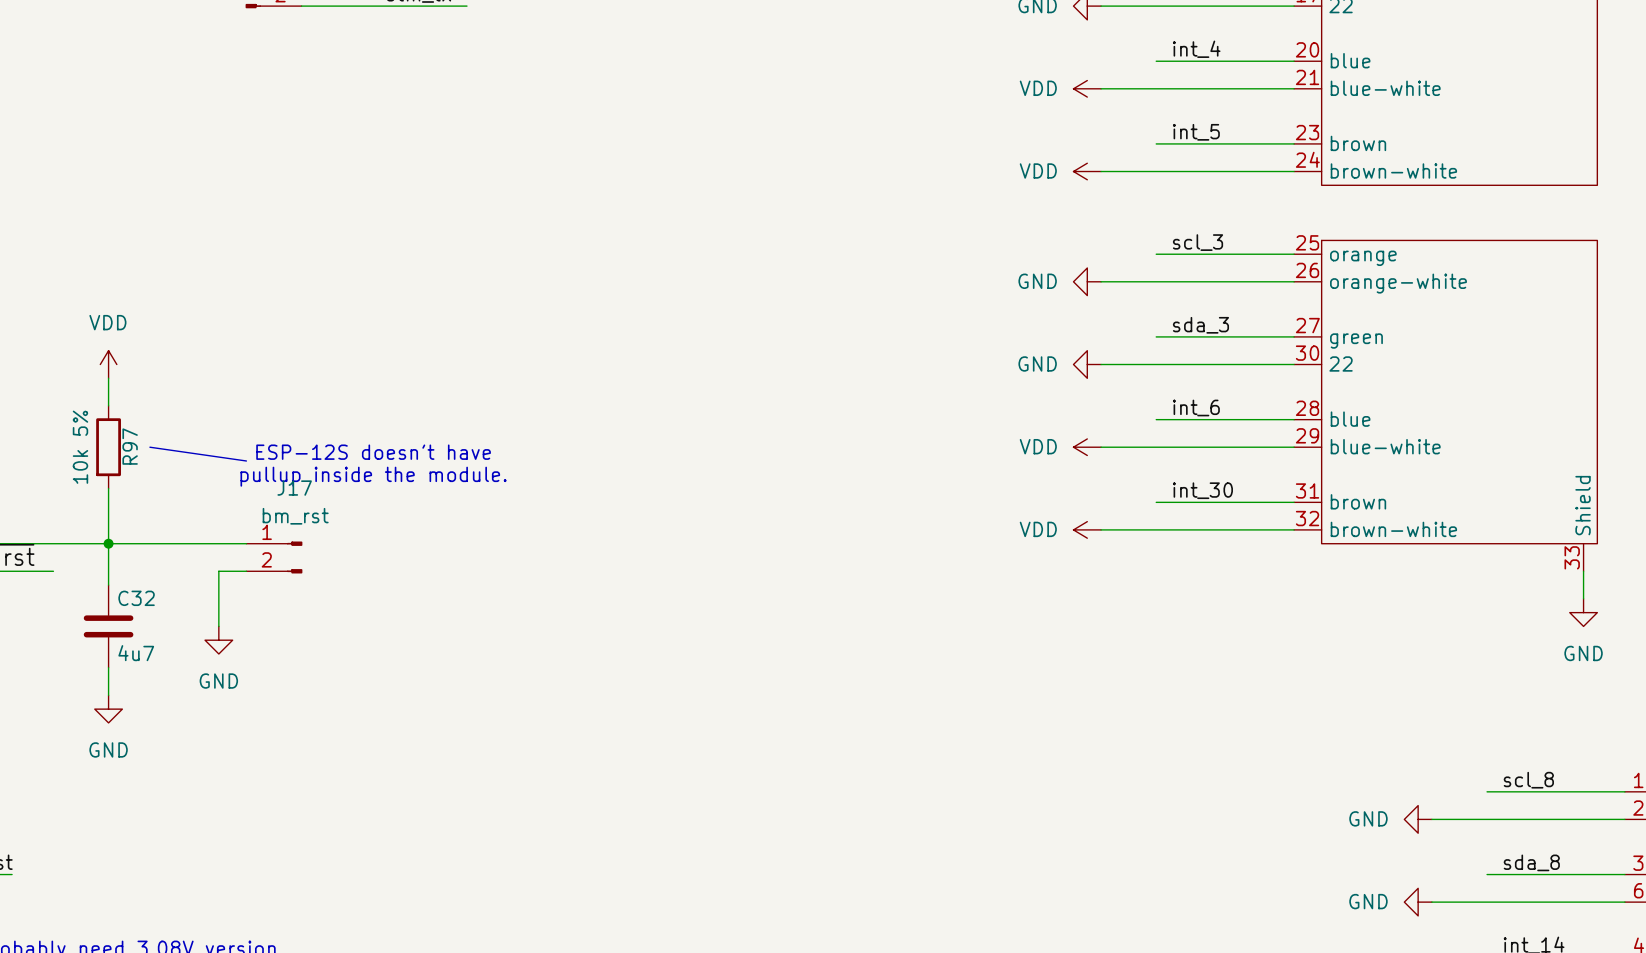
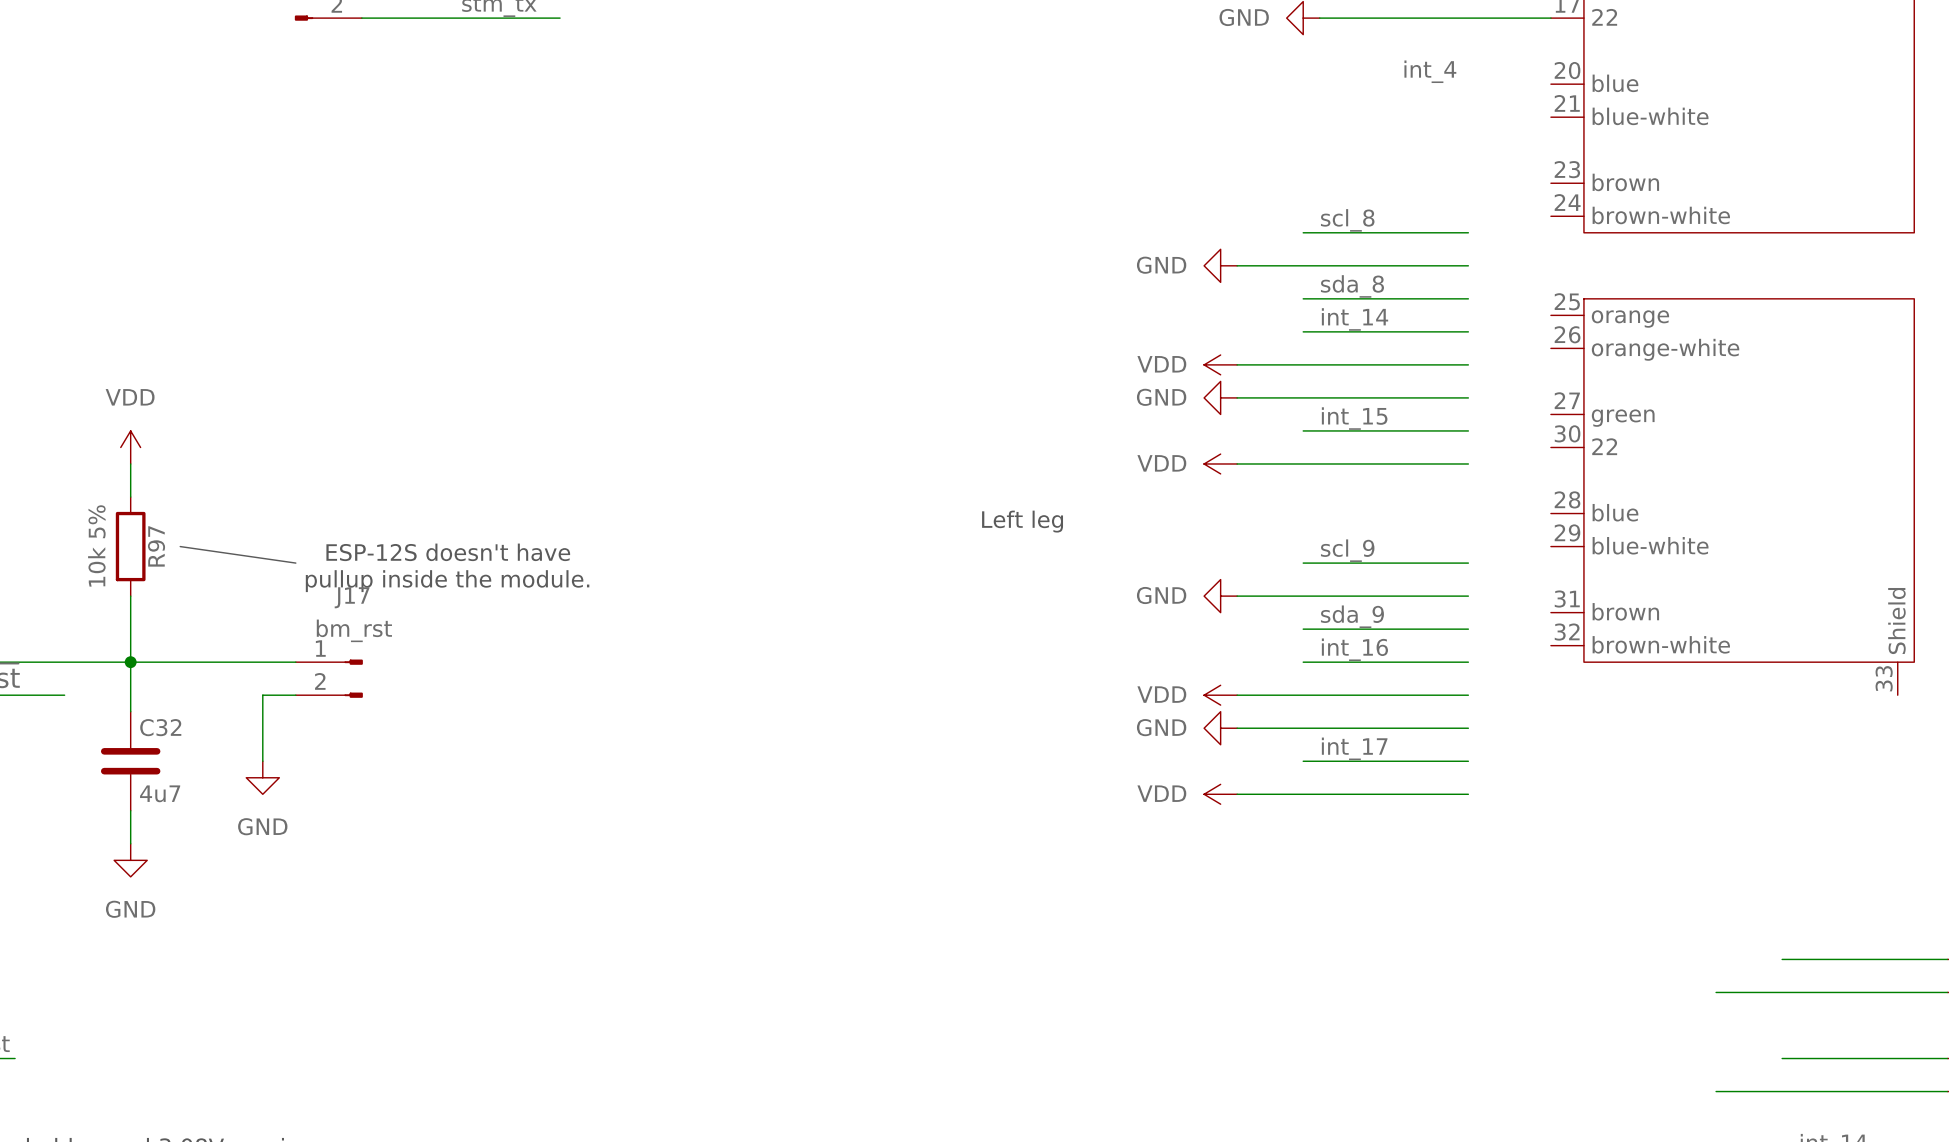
wire: (1156, 61) (1294, 61) -> (1303, 331) (1468, 331)
power symbol: VDD (1087, 88) -> none
wire: (1101, 88) (1294, 88) -> (1237, 364) (1468, 364)
label: int_5 (1196, 132) -> none
wire: (1156, 143) (1294, 143) -> (1303, 232) (1468, 232)
power symbol: VDD (1087, 171) -> none
wire: (1101, 171) (1294, 171) -> (1237, 265) (1468, 265)
label: none -> scl_8 (1347, 220)
power symbol: none -> GND (1220, 265)
label: none -> sda_8 (1352, 286)
label: scl_3 (1198, 242) -> none
wire: (1156, 254) (1294, 254) -> (1303, 298) (1468, 298)
label: none -> int_14 (1355, 319)
power symbol: GND (1087, 281) -> none
wire: (1101, 281) (1294, 281) -> (1237, 397) (1468, 397)
power symbol: none -> VDD (1220, 364)
power symbol: none -> GND (1220, 397)
label: sda_3 (1200, 325) -> none
wire: (1156, 336) (1294, 336) -> (1303, 430) (1468, 430)
label: none -> int_15 (1354, 418)
power symbol: GND (1087, 364) -> none
wire: (1101, 364) (1294, 364) -> (1237, 728) (1468, 728)
power symbol: none -> VDD (1220, 463)
wire: none -> (1237, 463) (1468, 463)
label: int_6 (1196, 408) -> none
wire: (1156, 419) (1294, 419) -> (1303, 563) (1468, 563)
text: none -> Left leg (1022, 521)
power symbol: VDD (1087, 447) -> none
wire: (1101, 447) (1294, 447) -> (1237, 596) (1468, 596)
label: none -> scl_9 (1347, 550)
power symbol: none -> GND (1220, 596)
label: int_30 (1202, 490) -> none
wire: (1156, 502) (1294, 502) -> (1303, 662) (1468, 662)
label: none -> sda_9 (1352, 616)
wire: none -> (1303, 629) (1468, 629)
power symbol: VDD (1087, 529) -> none
wire: (1101, 529) (1294, 529) -> (1237, 695) (1468, 695)
label: none -> int_16 (1354, 649)
power symbol: none -> VDD (1220, 695)
wire: (1583, 571) (1583, 598) -> none
power symbol: none -> GND (1220, 728)
power symbol: GND (1583, 612) -> none
label: none -> int_17 (1354, 748)
wire: none -> (1303, 761) (1468, 761)
power symbol: none -> VDD (1220, 794)
wire: none -> (1237, 794) (1468, 794)
label: scl_8 (1528, 780) -> none
power symbol: GND (1418, 819) -> none
label: sda_8 (1531, 862) -> none
power symbol: GND (1418, 902) -> none

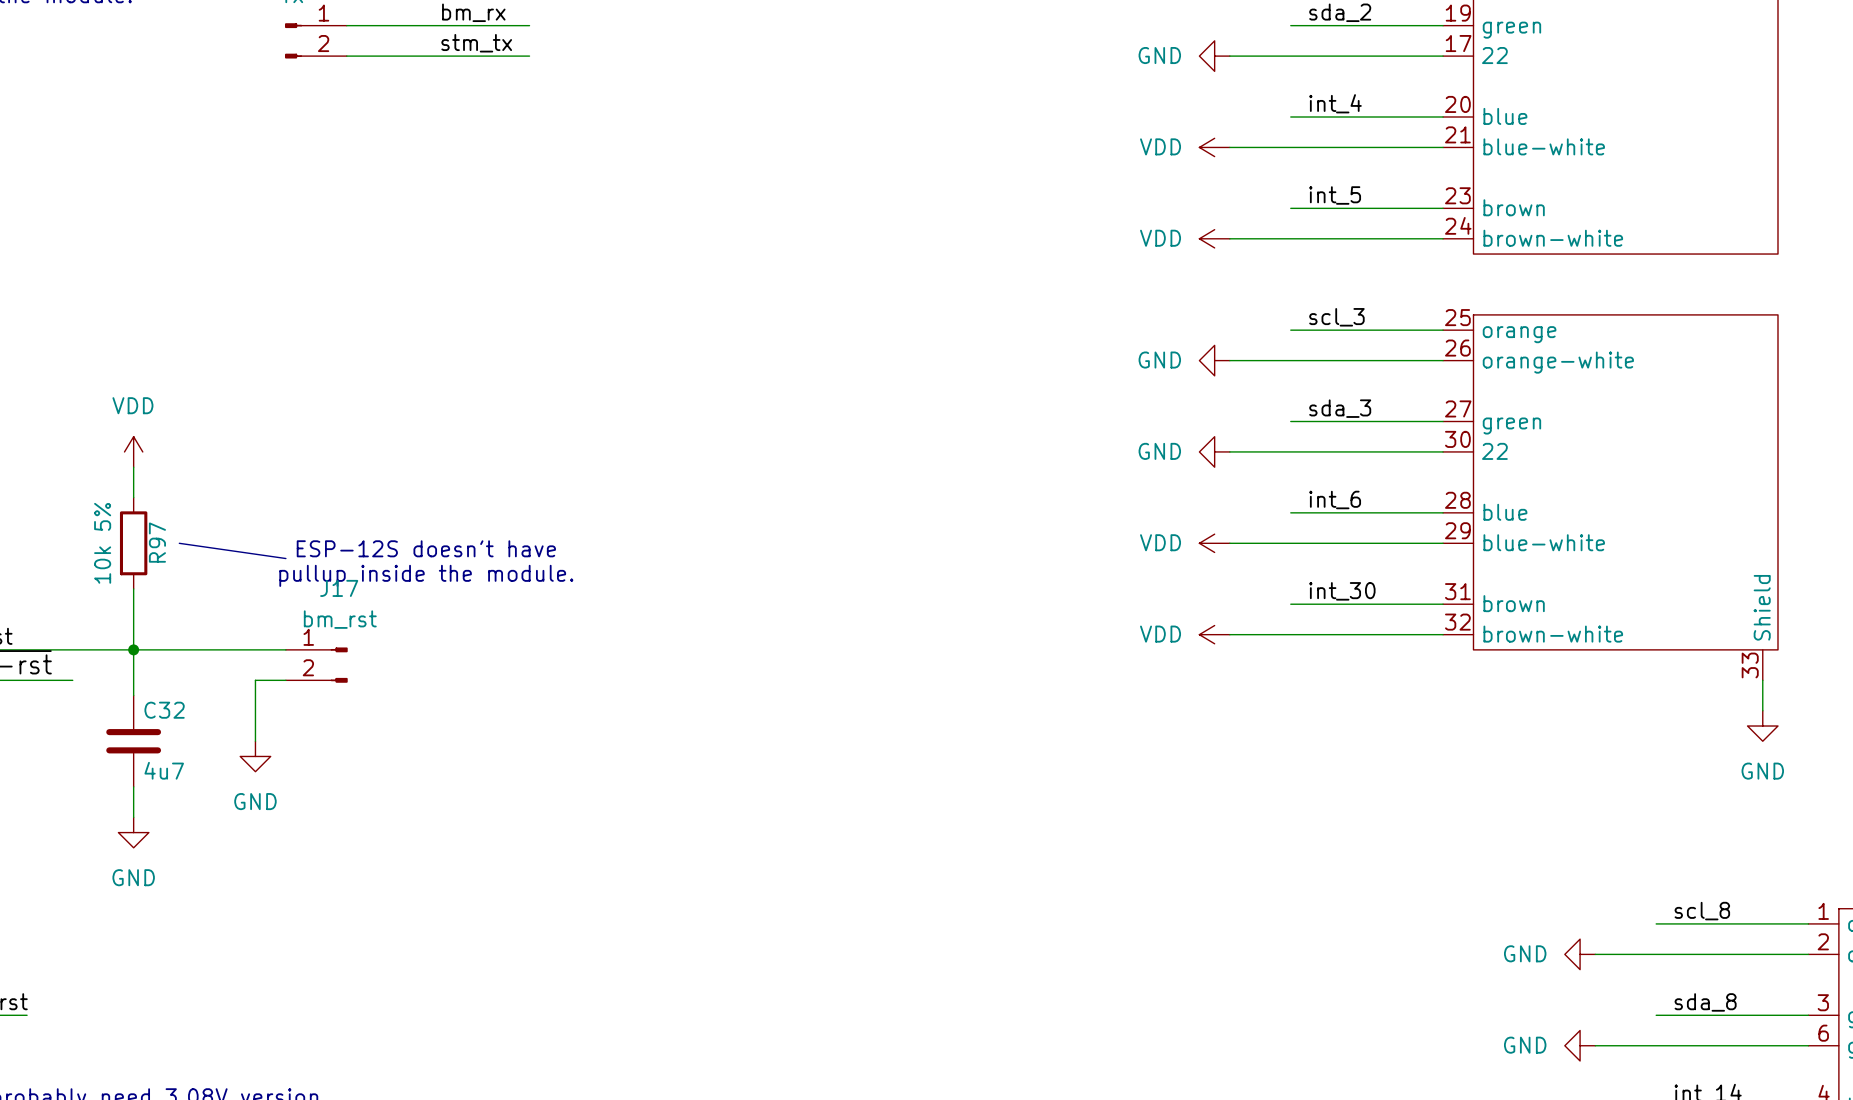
power symbol: none -> VDD (1214, 147)
label: none -> int_5 (1335, 195)
power symbol: none -> VDD (1214, 238)
label: scl_8 (1347, 220) -> none
wire: (1303, 232) (1468, 232) -> (1290, 208) (1443, 208)
power symbol: GND (1220, 265) -> none
wire: (1237, 265) (1468, 265) -> (1229, 238) (1443, 238)
label: sda_8 (1352, 286) -> none
wire: (1303, 298) (1468, 298) -> (1290, 330) (1443, 330)
label: none -> scl_3 (1336, 317)
label: int_14 (1355, 319) -> none
wire: (1303, 331) (1468, 331) -> (1290, 116) (1443, 116)
power symbol: none -> GND (1214, 360)
power symbol: VDD (1220, 364) -> none
wire: (1237, 364) (1468, 364) -> (1229, 147) (1443, 147)
power symbol: GND (1220, 397) -> none
wire: (1237, 397) (1468, 397) -> (1229, 360) (1443, 360)
label: none -> sda_3 (1340, 408)
label: int_15 (1354, 418) -> none
wire: (1303, 430) (1468, 430) -> (1290, 421) (1443, 421)
power symbol: none -> GND (1214, 451)
power symbol: VDD (1220, 463) -> none
wire: (1237, 463) (1468, 463) -> none
label: none -> int_6 (1335, 499)
text: Left leg (1022, 521) -> none
power symbol: none -> VDD (1214, 543)
label: scl_9 (1347, 550) -> none
wire: (1303, 563) (1468, 563) -> (1290, 512) (1443, 512)
power symbol: GND (1220, 596) -> none
wire: (1237, 596) (1468, 596) -> (1229, 543) (1443, 543)
label: none -> int_30 (1342, 591)
label: sda_9 (1352, 616) -> none
wire: (1303, 629) (1468, 629) -> none
power symbol: none -> VDD (1214, 634)
label: int_16 (1354, 649) -> none
wire: (1303, 662) (1468, 662) -> (1290, 604) (1443, 604)
power symbol: VDD (1220, 695) -> none
wire: (1237, 695) (1468, 695) -> (1229, 634) (1443, 634)
wire: none -> (1762, 680) (1762, 710)
power symbol: GND (1220, 728) -> none
wire: (1237, 728) (1468, 728) -> (1229, 451) (1443, 451)
power symbol: none -> GND (1762, 726)
label: int_17 (1354, 748) -> none
wire: (1303, 761) (1468, 761) -> none
power symbol: VDD (1220, 794) -> none
wire: (1237, 794) (1468, 794) -> none
label: none -> scl_8 (1702, 911)
power symbol: none -> GND (1580, 954)
label: none -> sda_8 (1705, 1002)
power symbol: none -> GND (1580, 1045)

